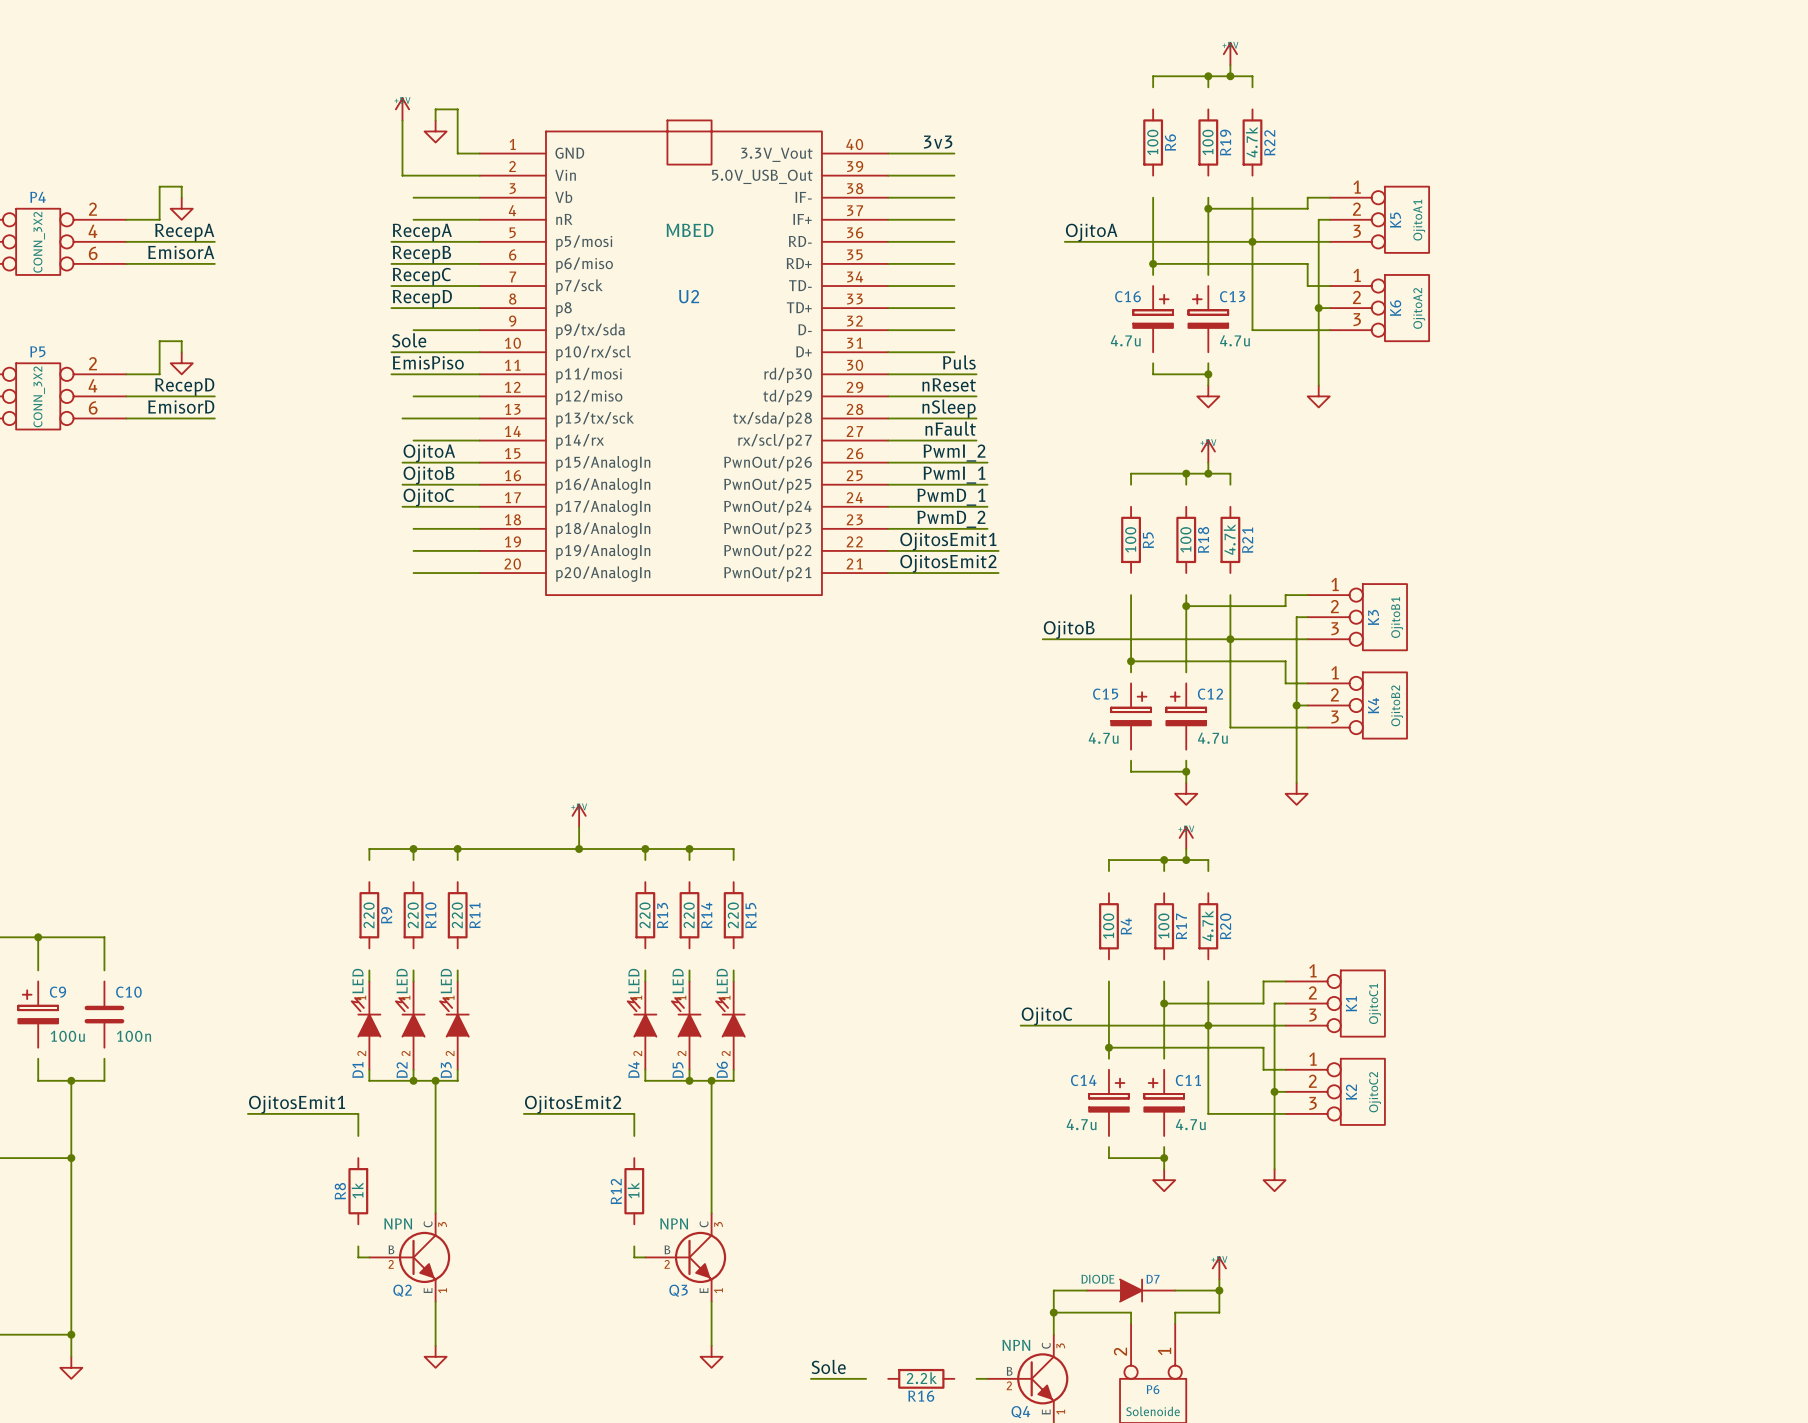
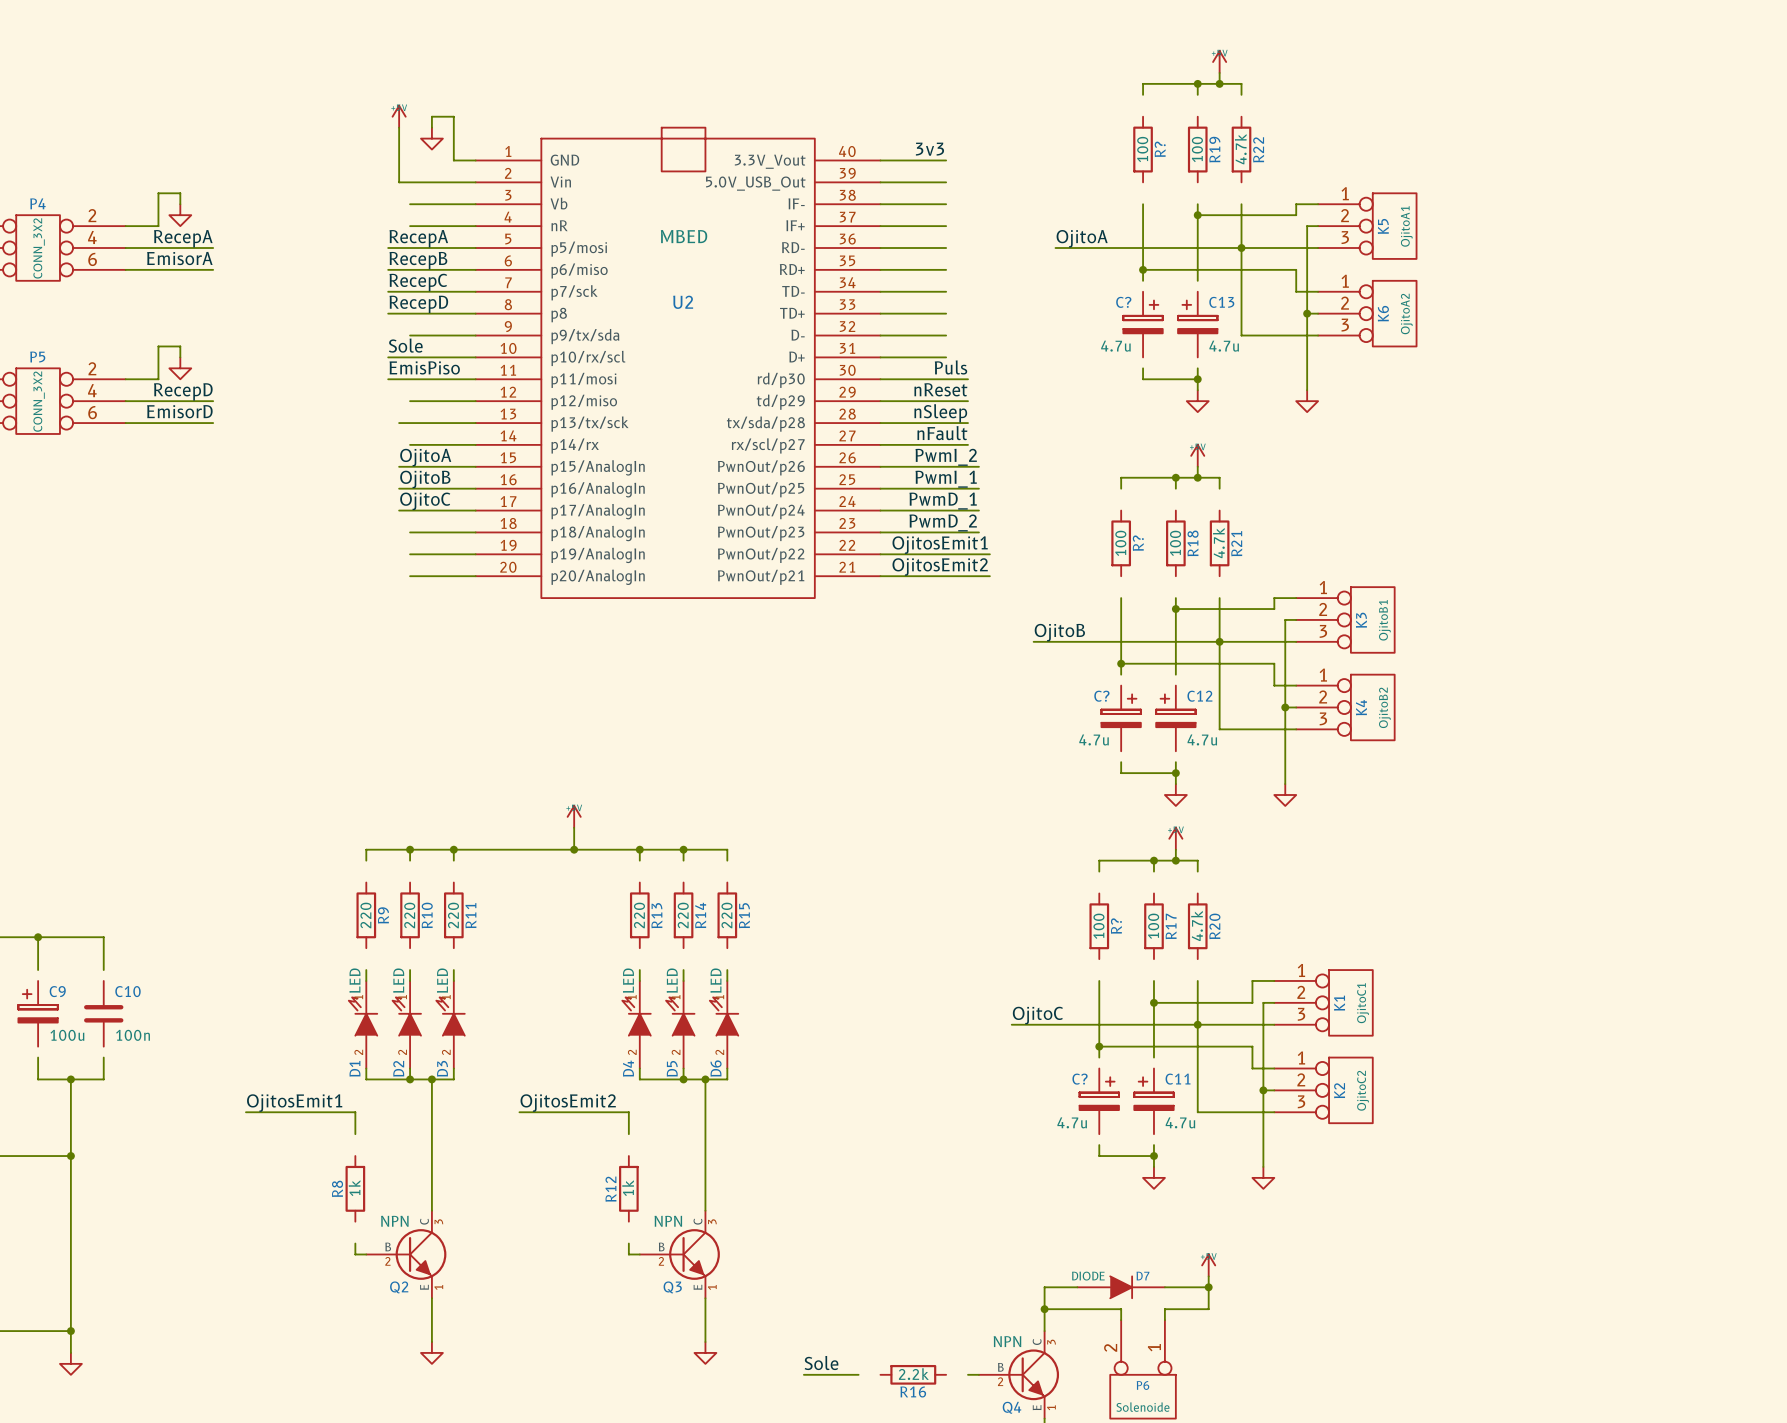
R6 name: R6 (1170, 142) -> R? (1160, 149)
C16 name: C16 (1127, 296) -> C? (1123, 302)
R5 name: R5 (1148, 540) -> R? (1138, 543)
C15 name: C15 (1105, 694) -> C? (1101, 696)
R4 name: R4 (1126, 926) -> R? (1116, 926)
C14 name: C14 (1083, 1080) -> C? (1080, 1079)

